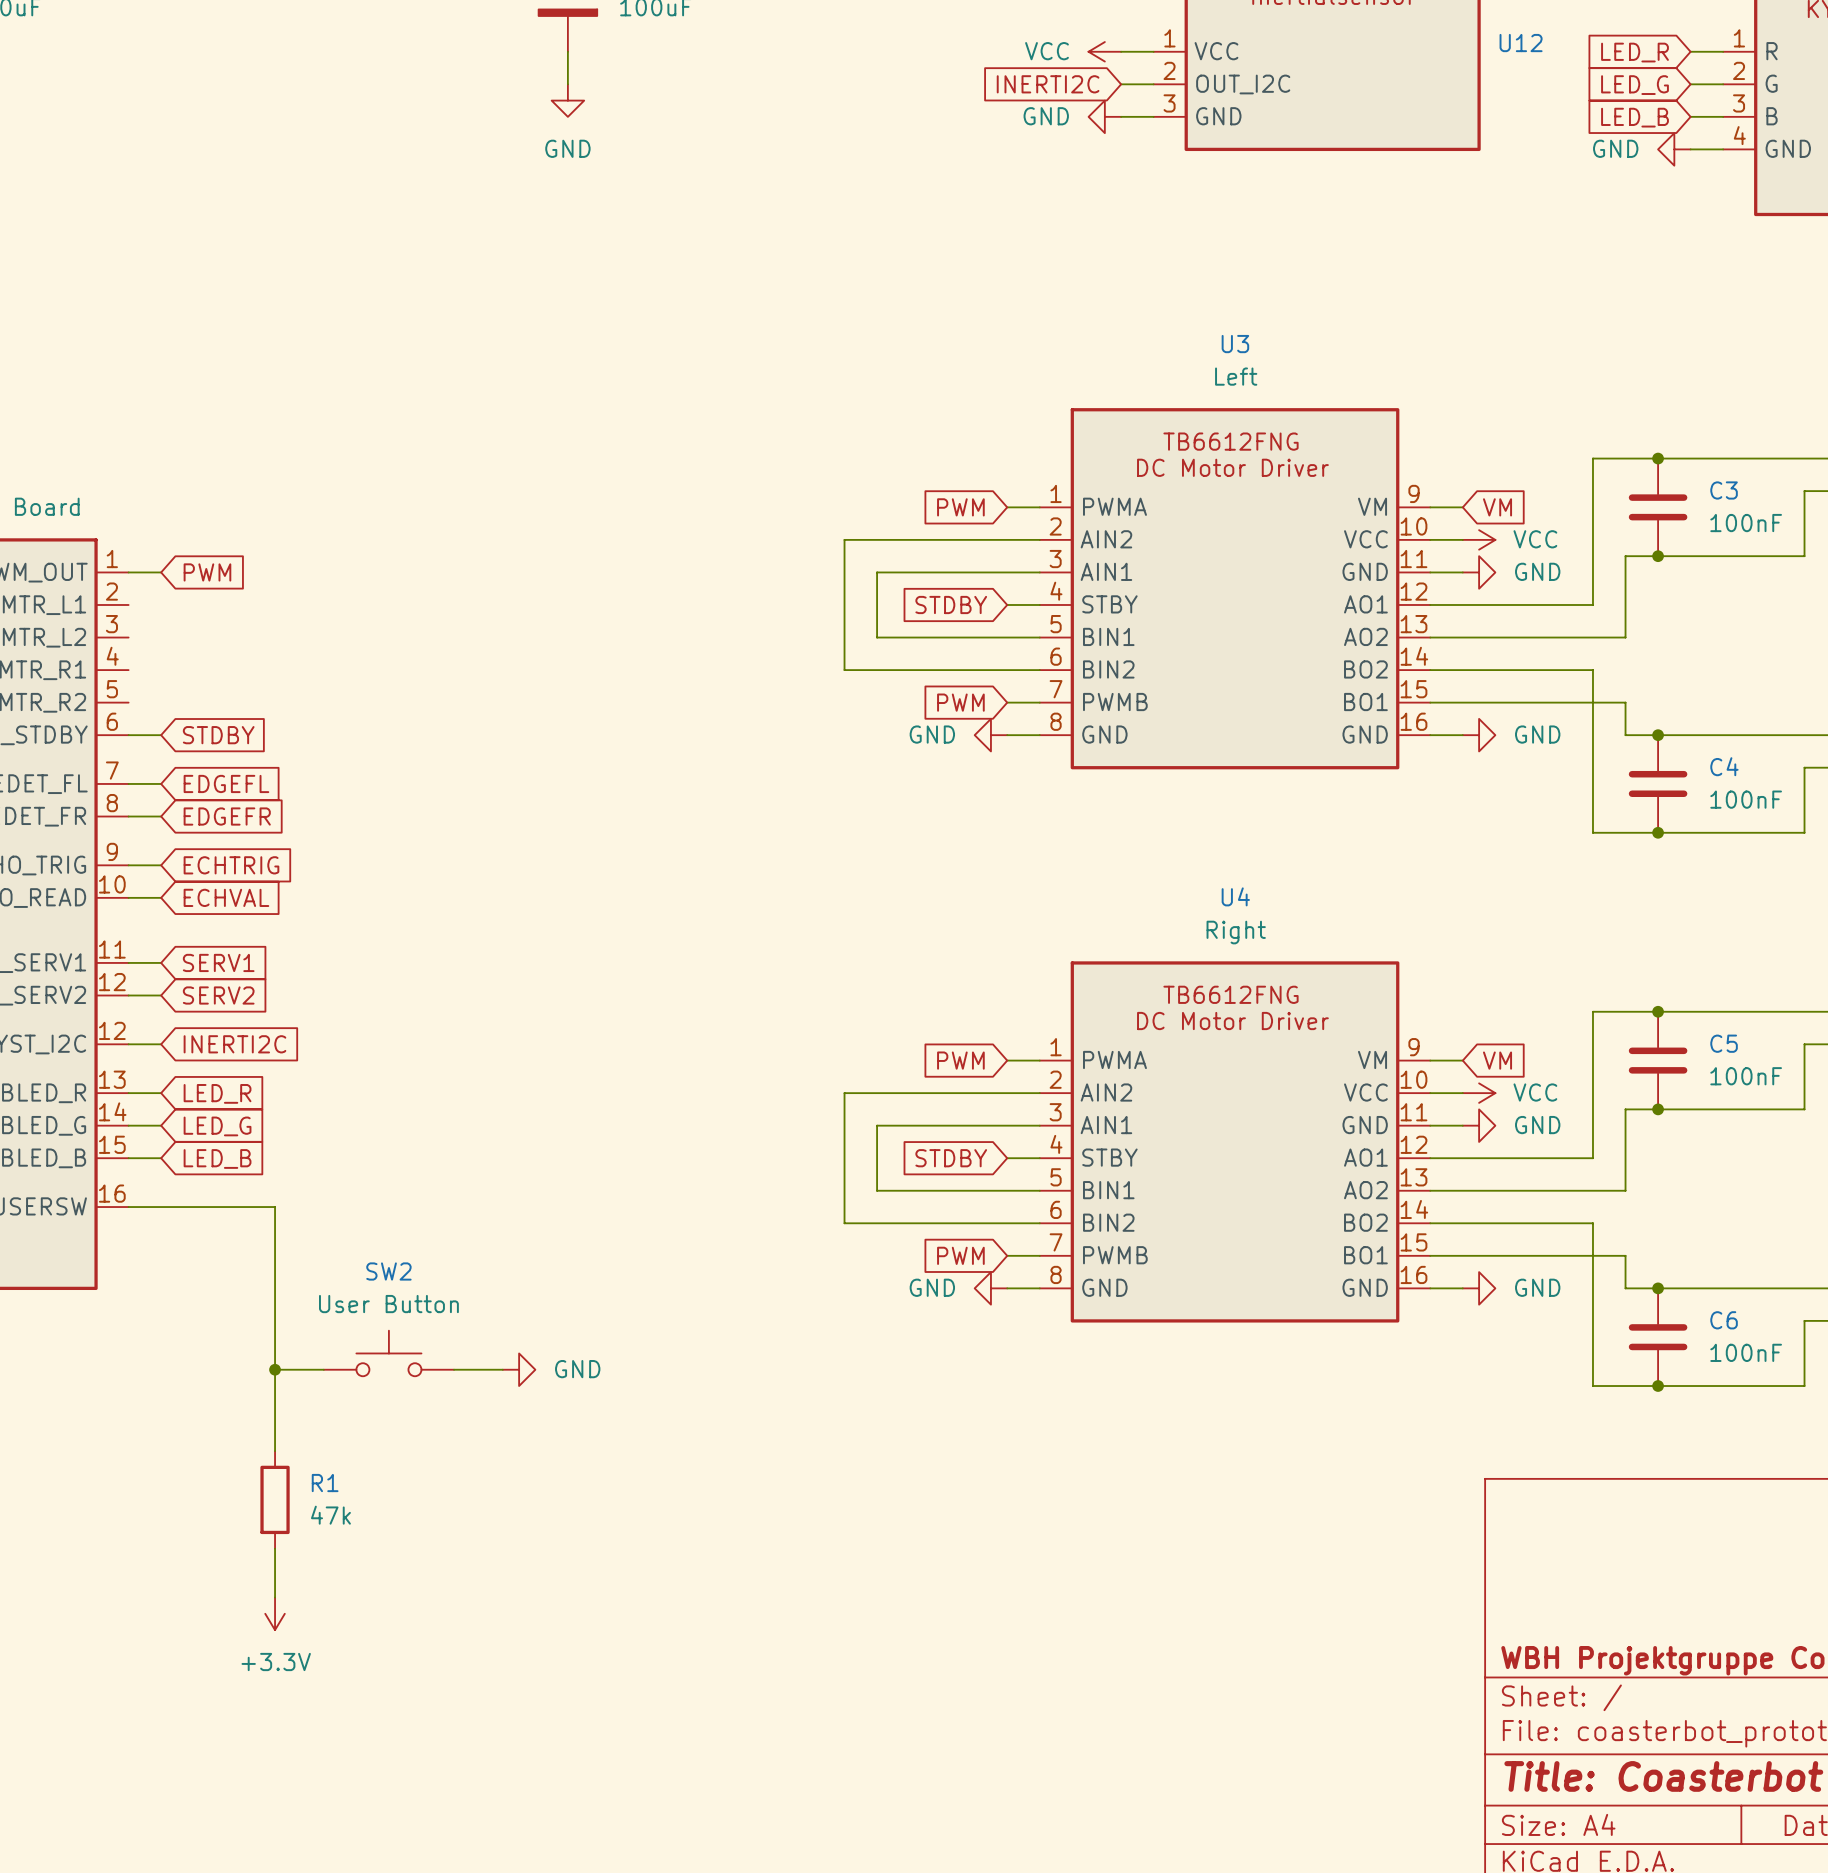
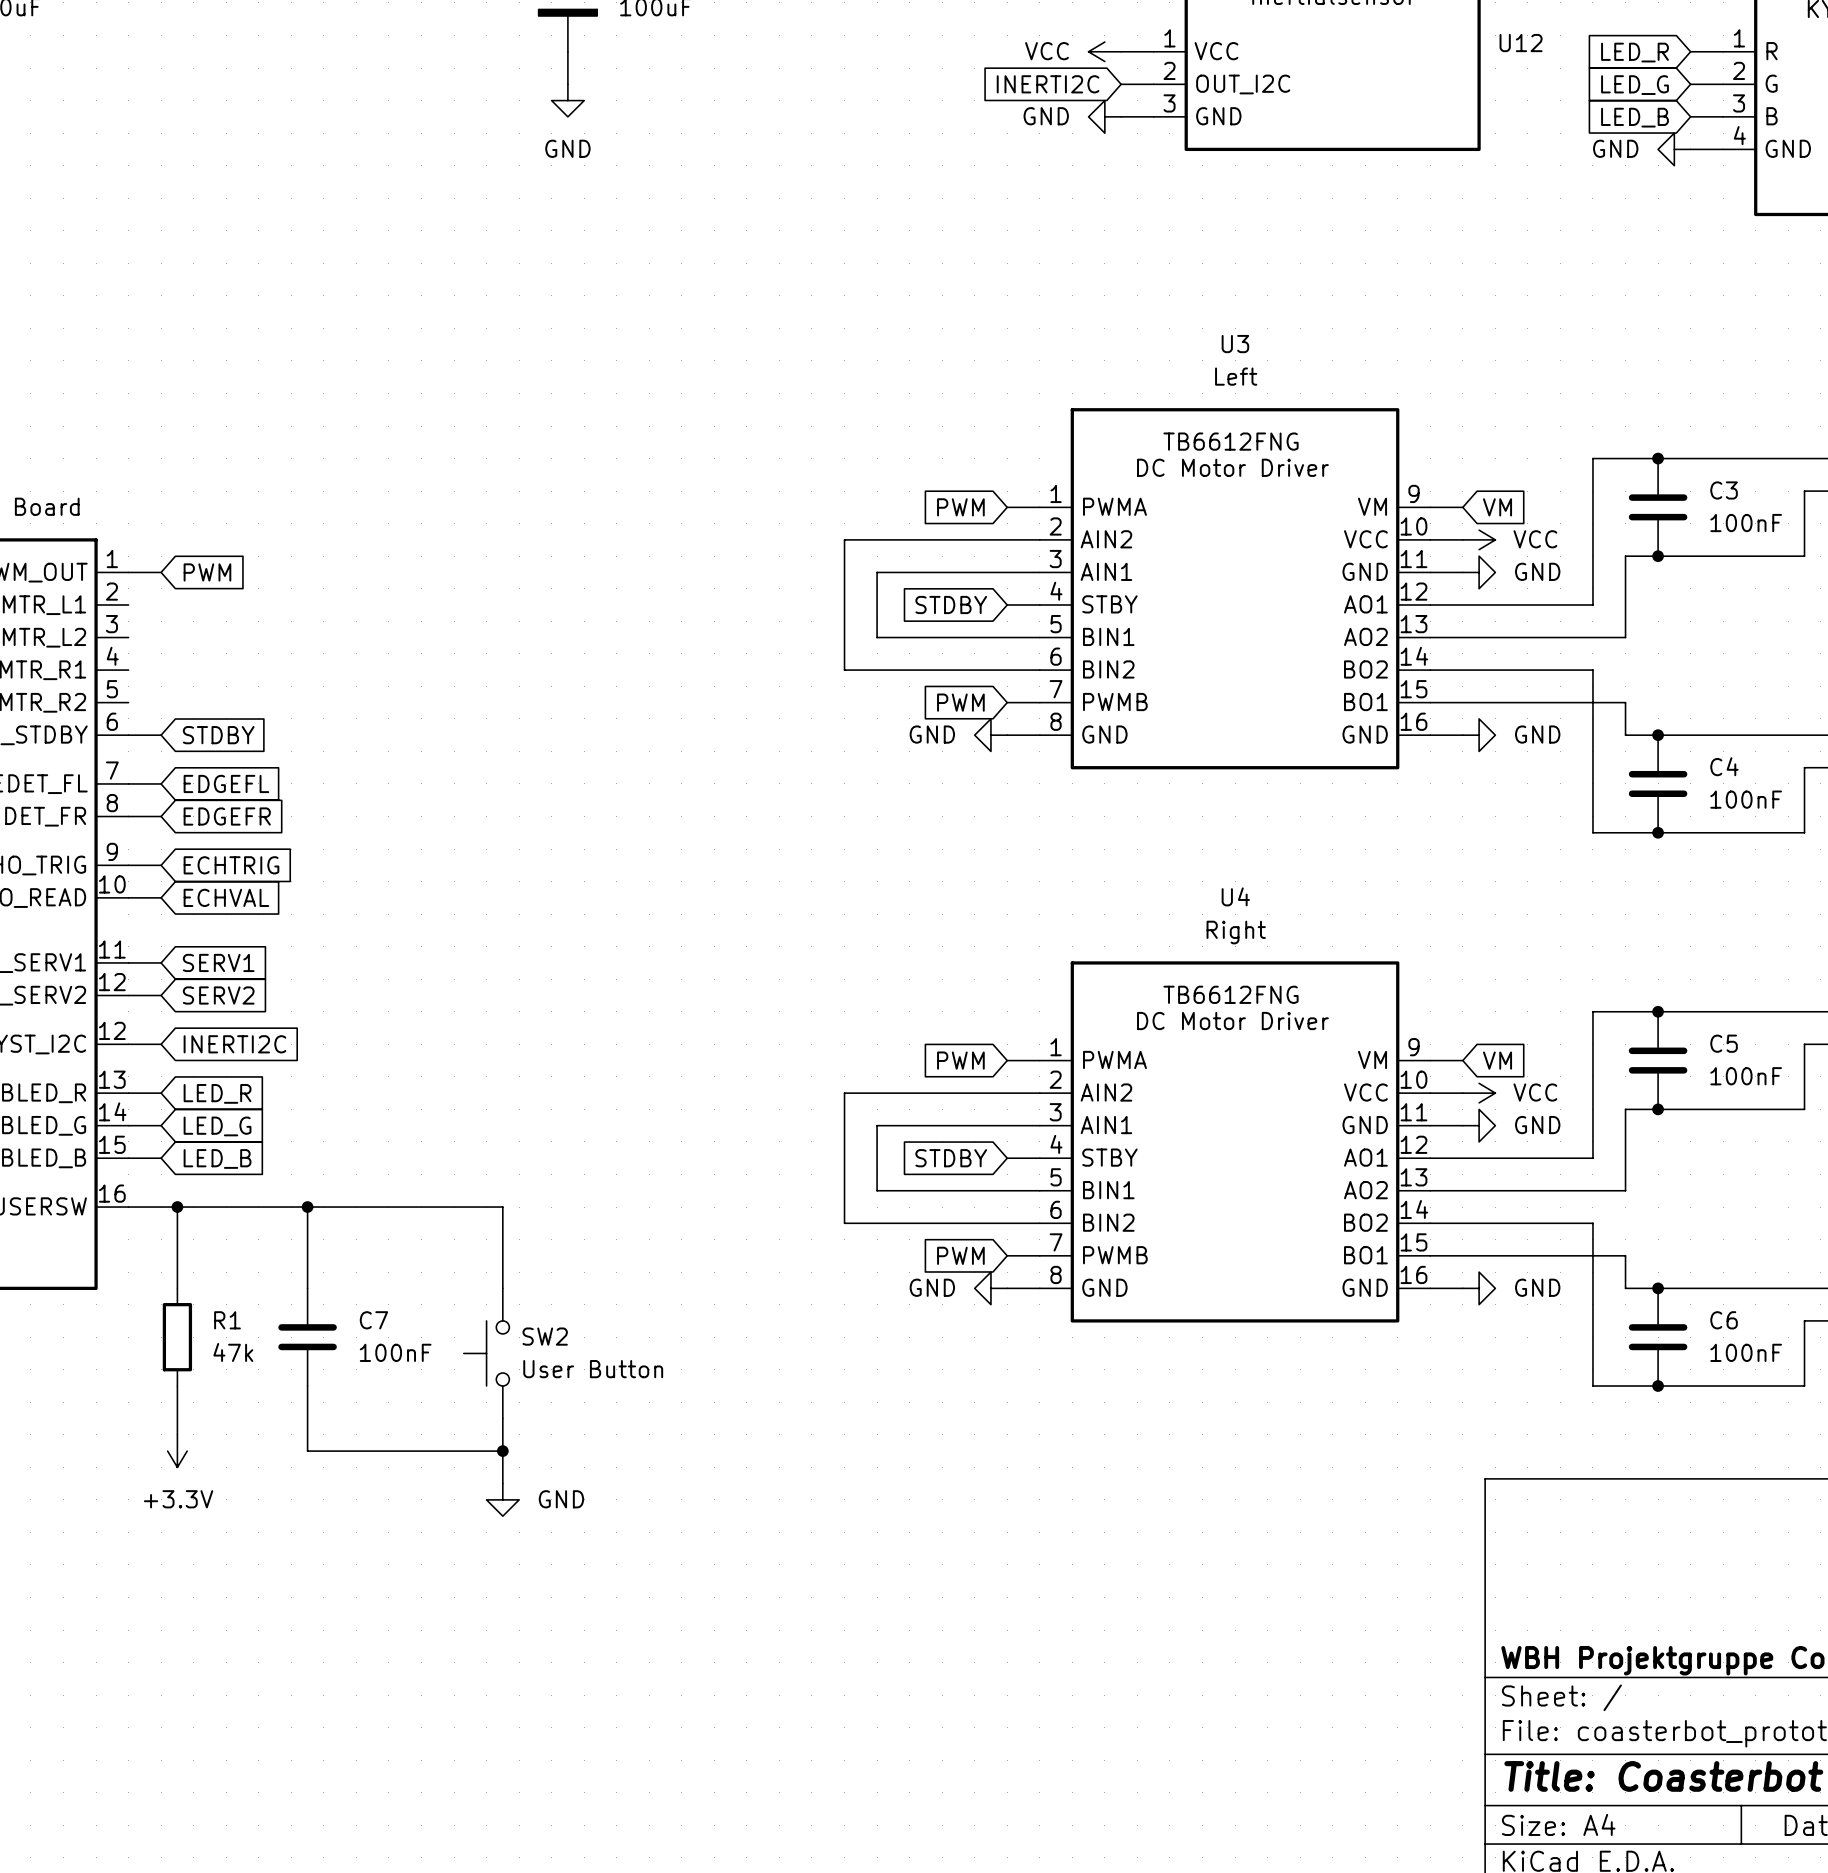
wire: none -> (177, 1207) (177, 1288)
junction: none -> (177, 1207)
wire: (275, 1207) (275, 1451) -> (275, 1207) (502, 1207) (502, 1288)
wire: none -> (307, 1207) (307, 1288)
junction: none -> (307, 1207)
SW2 name position: SW2 (388, 1271) -> SW2 (545, 1336)
SW2 value position: User Button (388, 1304) -> User Button (593, 1369)
C7: none -> 100nF (307, 1337)
SW2 rotation: 0° (388, 1353) -> 90° counterclockwise (486, 1353)
SW2 position: (388, 1353) -> (486, 1353)
wire: (275, 1369) (323, 1369) -> none
junction: (275, 1369) -> none
wire: (454, 1369) (502, 1369) -> none
power symbol rotation: 0° (519, 1369) -> 90° clockwise (502, 1499)
power symbol position: GND (519, 1369) -> GND (502, 1499)
wire: none -> (307, 1386) (307, 1451) (502, 1451)
wire: none -> (502, 1418) (502, 1483)
junction: none -> (502, 1451)
R1 position: (275, 1499) -> (177, 1337)
wire: (275, 1548) (275, 1597) -> (177, 1386) (177, 1434)
power symbol position: +3.3V (275, 1613) -> +3.3V (177, 1451)

